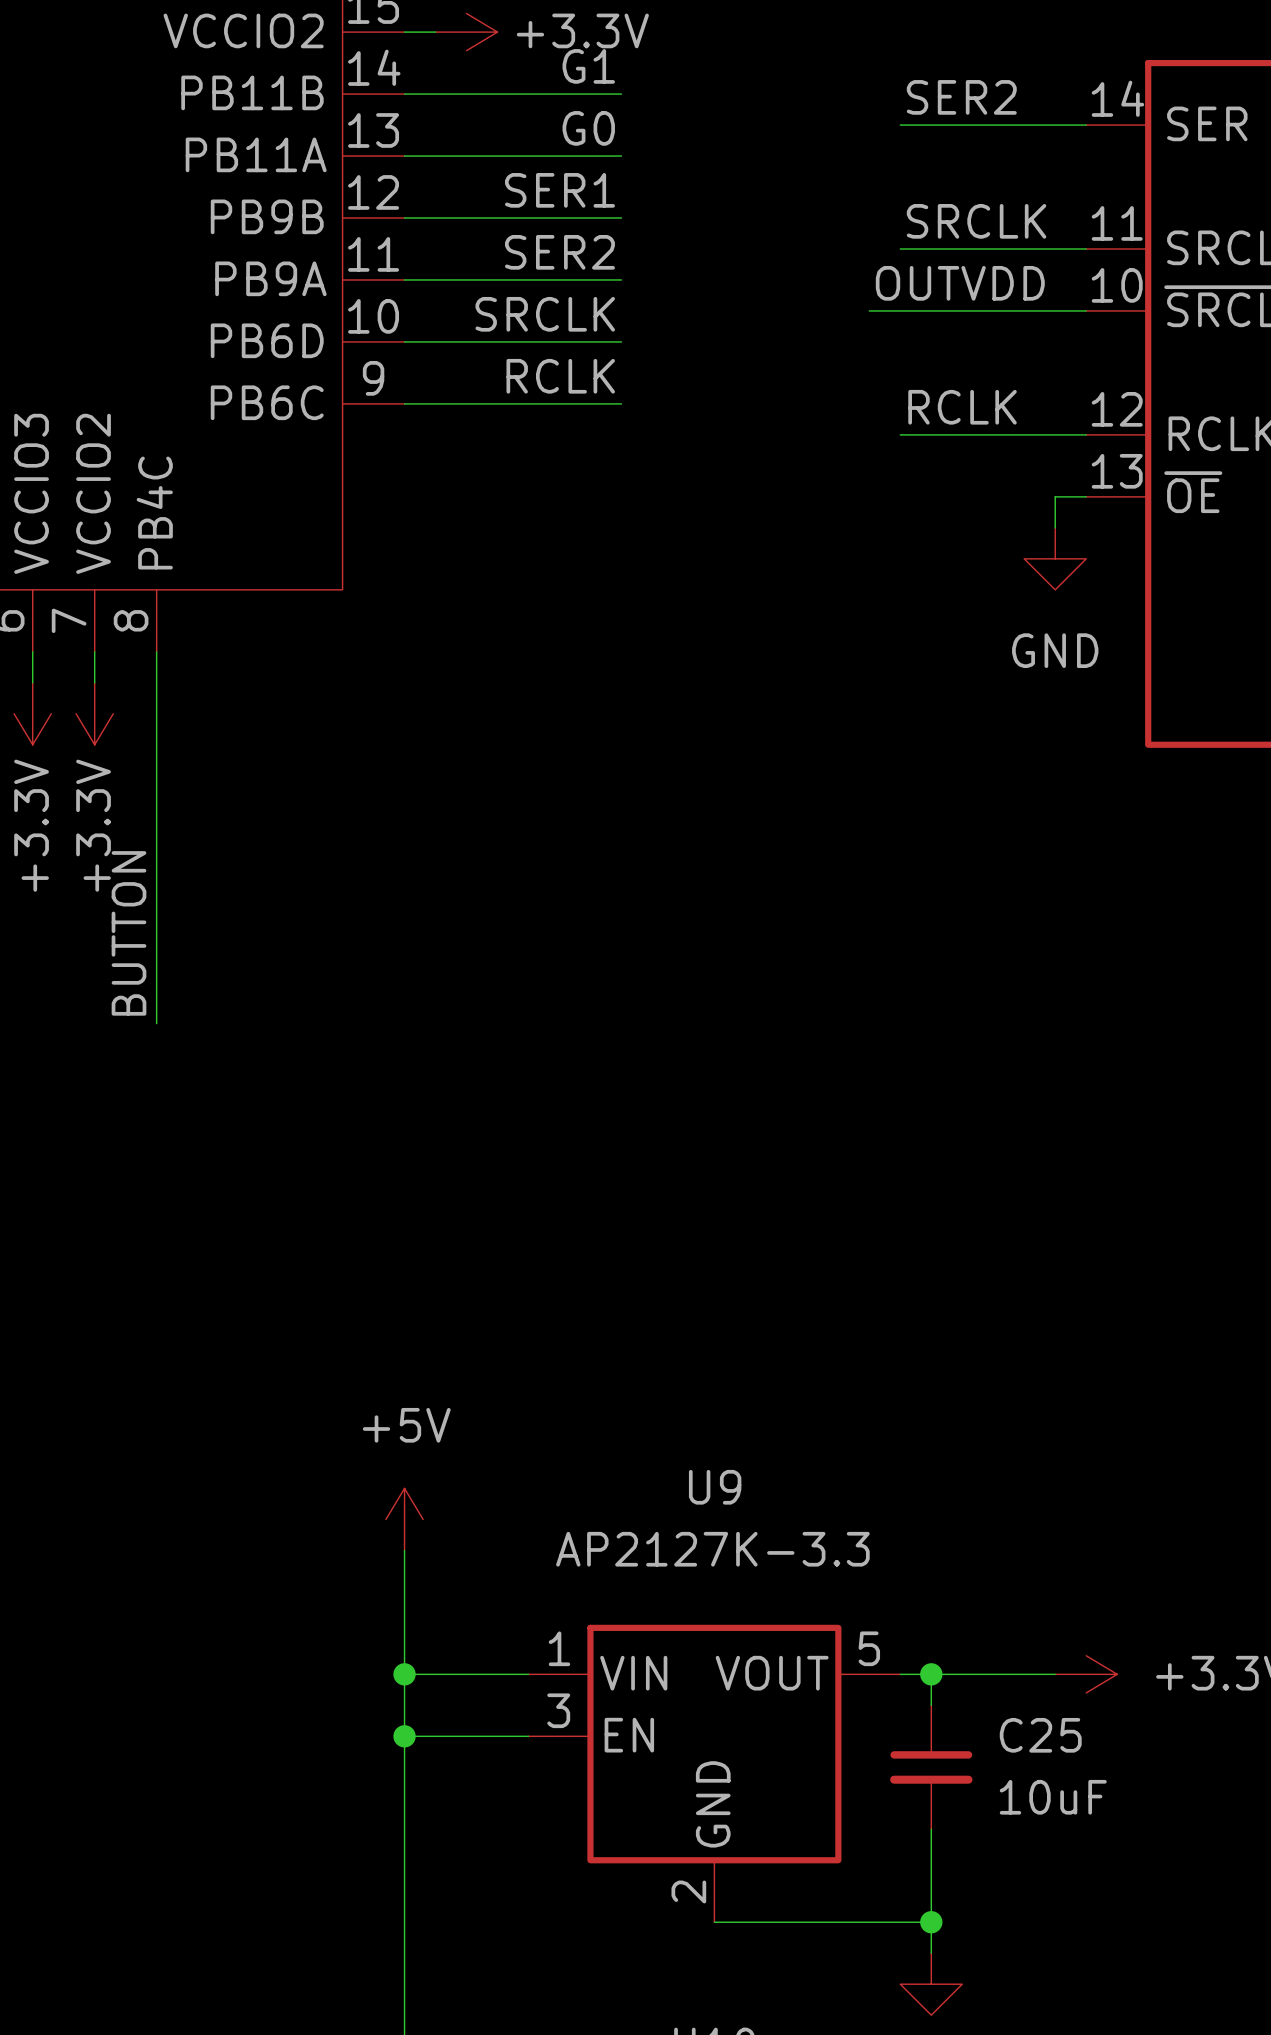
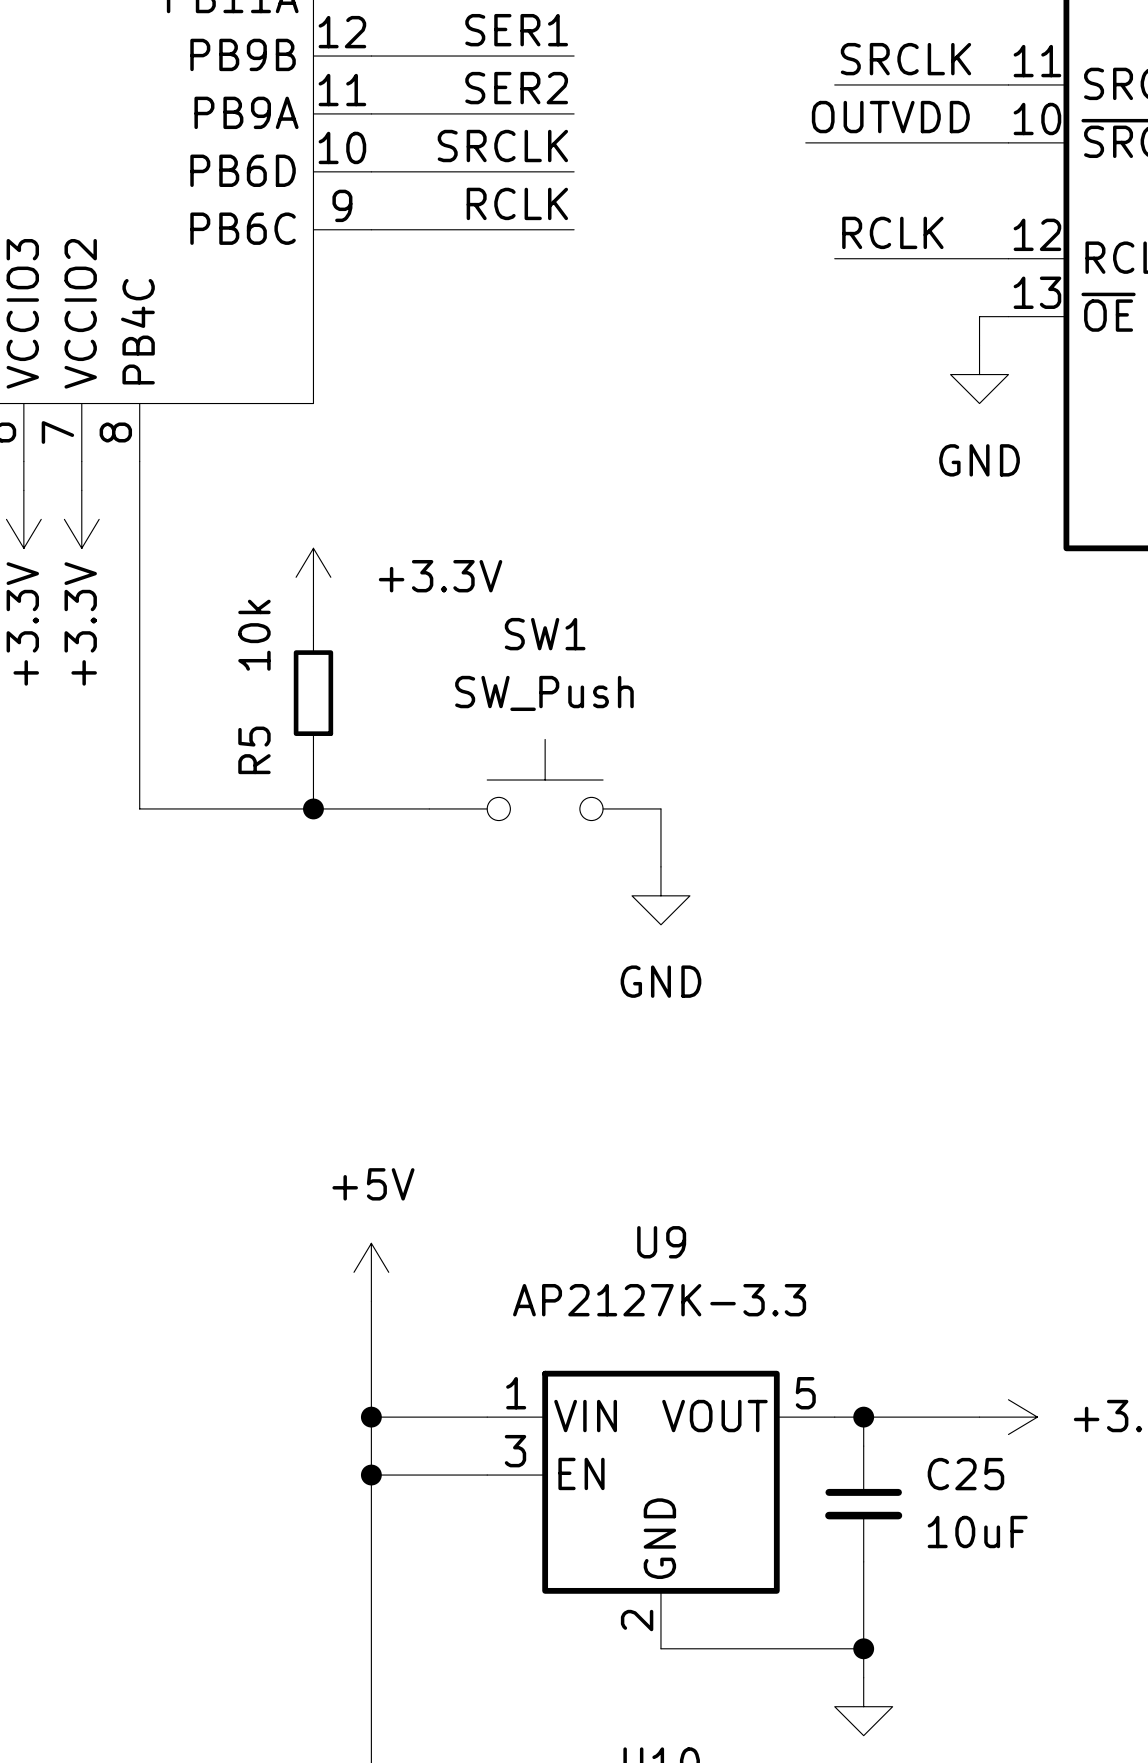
power symbol: none -> +3.3V (313, 577)
wire: none -> (313, 606) (313, 635)
R5: none -> 10k (313, 693)
label: BUTTON (129, 933) -> none
wire: none -> (313, 751) (313, 808)
SW1: none -> SW_Push (545, 780)
wire: none -> (139, 808) (429, 808)
junction: none -> (313, 808)
wire: none -> (660, 808) (660, 866)
power symbol: none -> GND (660, 895)

